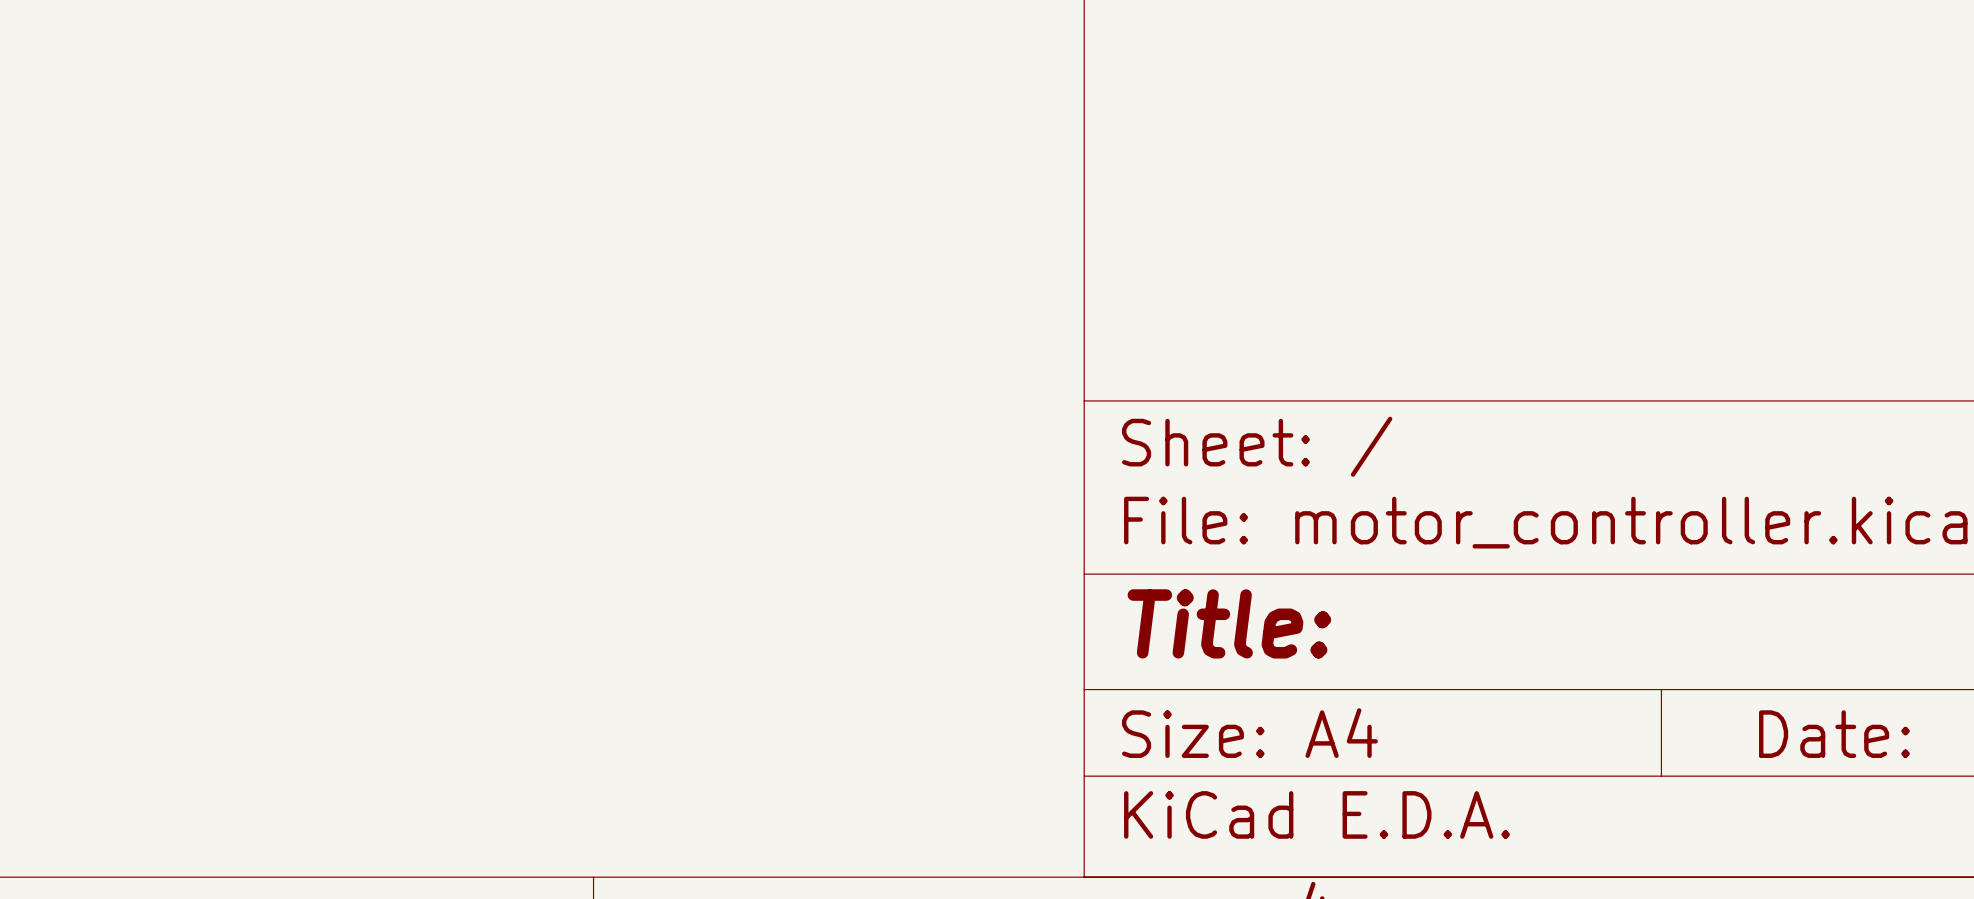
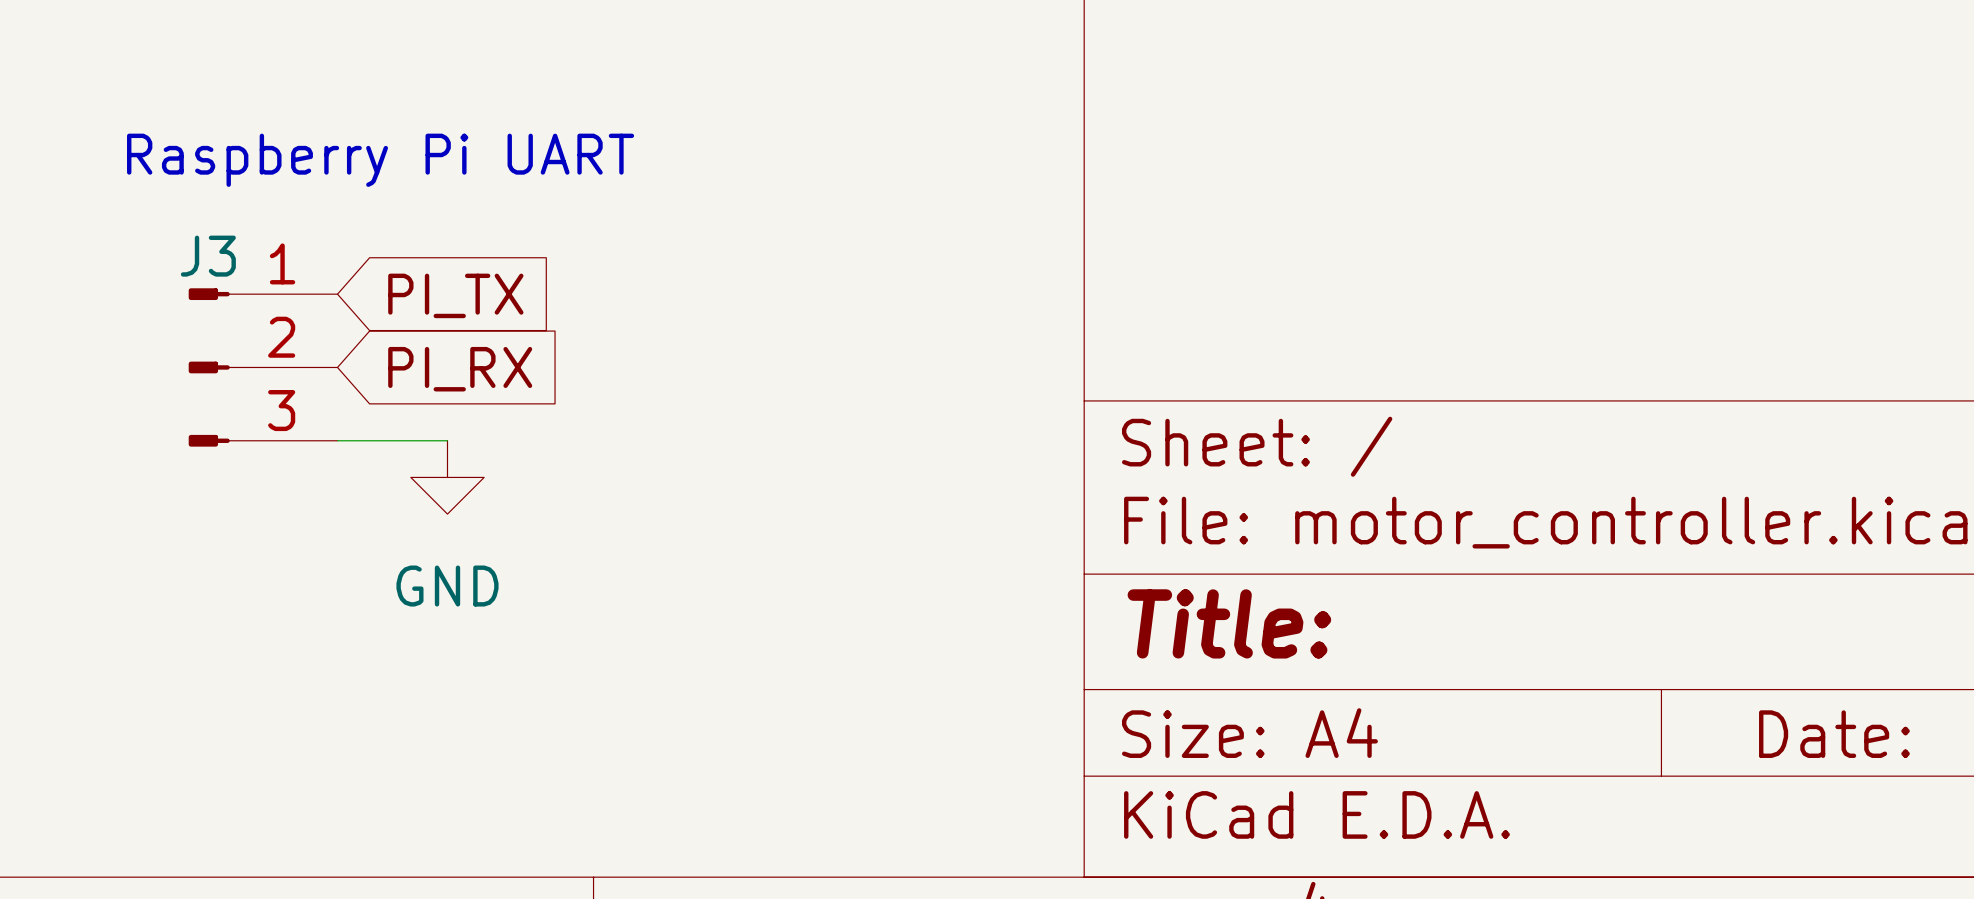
text: none -> Raspberry Pi UART (380, 160)
global label: none -> PI_TX (455, 295)
J3: none -> (263, 367)
global label: none -> PI_RX (460, 369)
wire: none -> (337, 440) (447, 440)
power symbol: none -> GND (447, 477)

